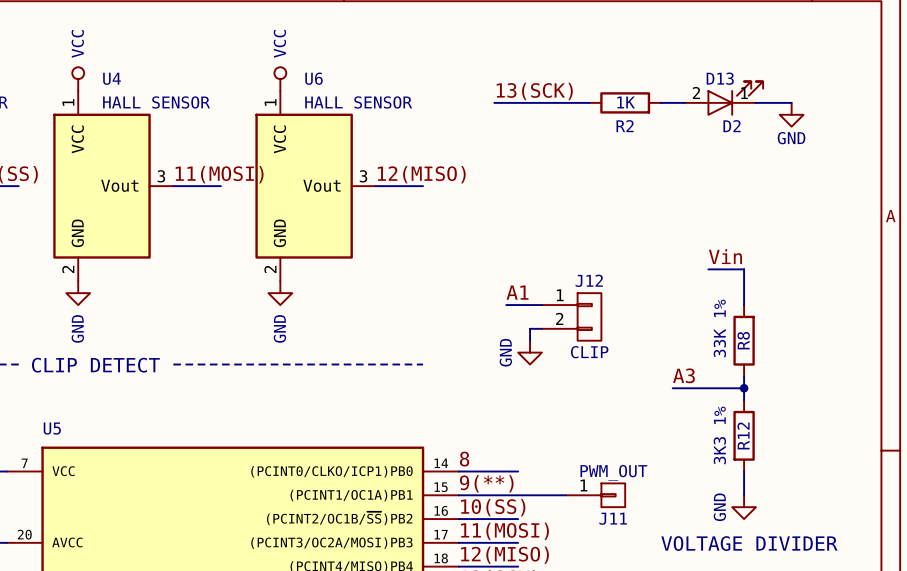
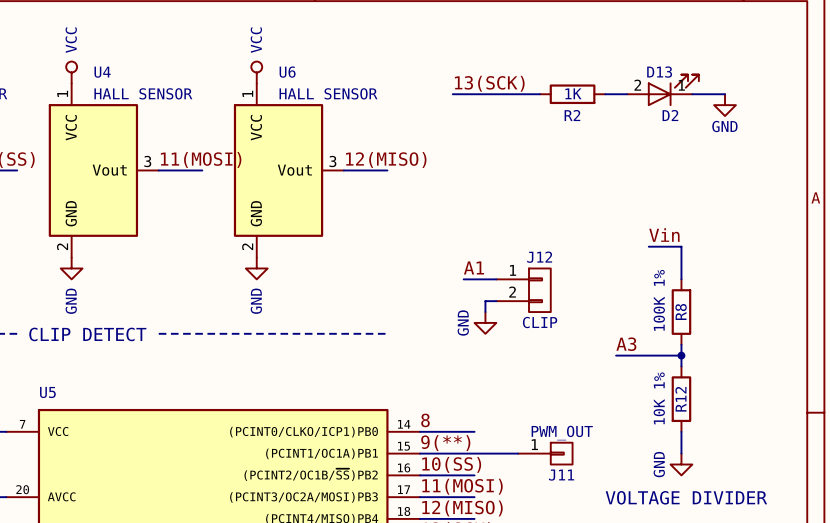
R8 value: 33K 1% (719, 328) -> 100K 1% (659, 300)
R12 value: 3K3 1% (719, 435) -> 10K 1% (659, 398)

